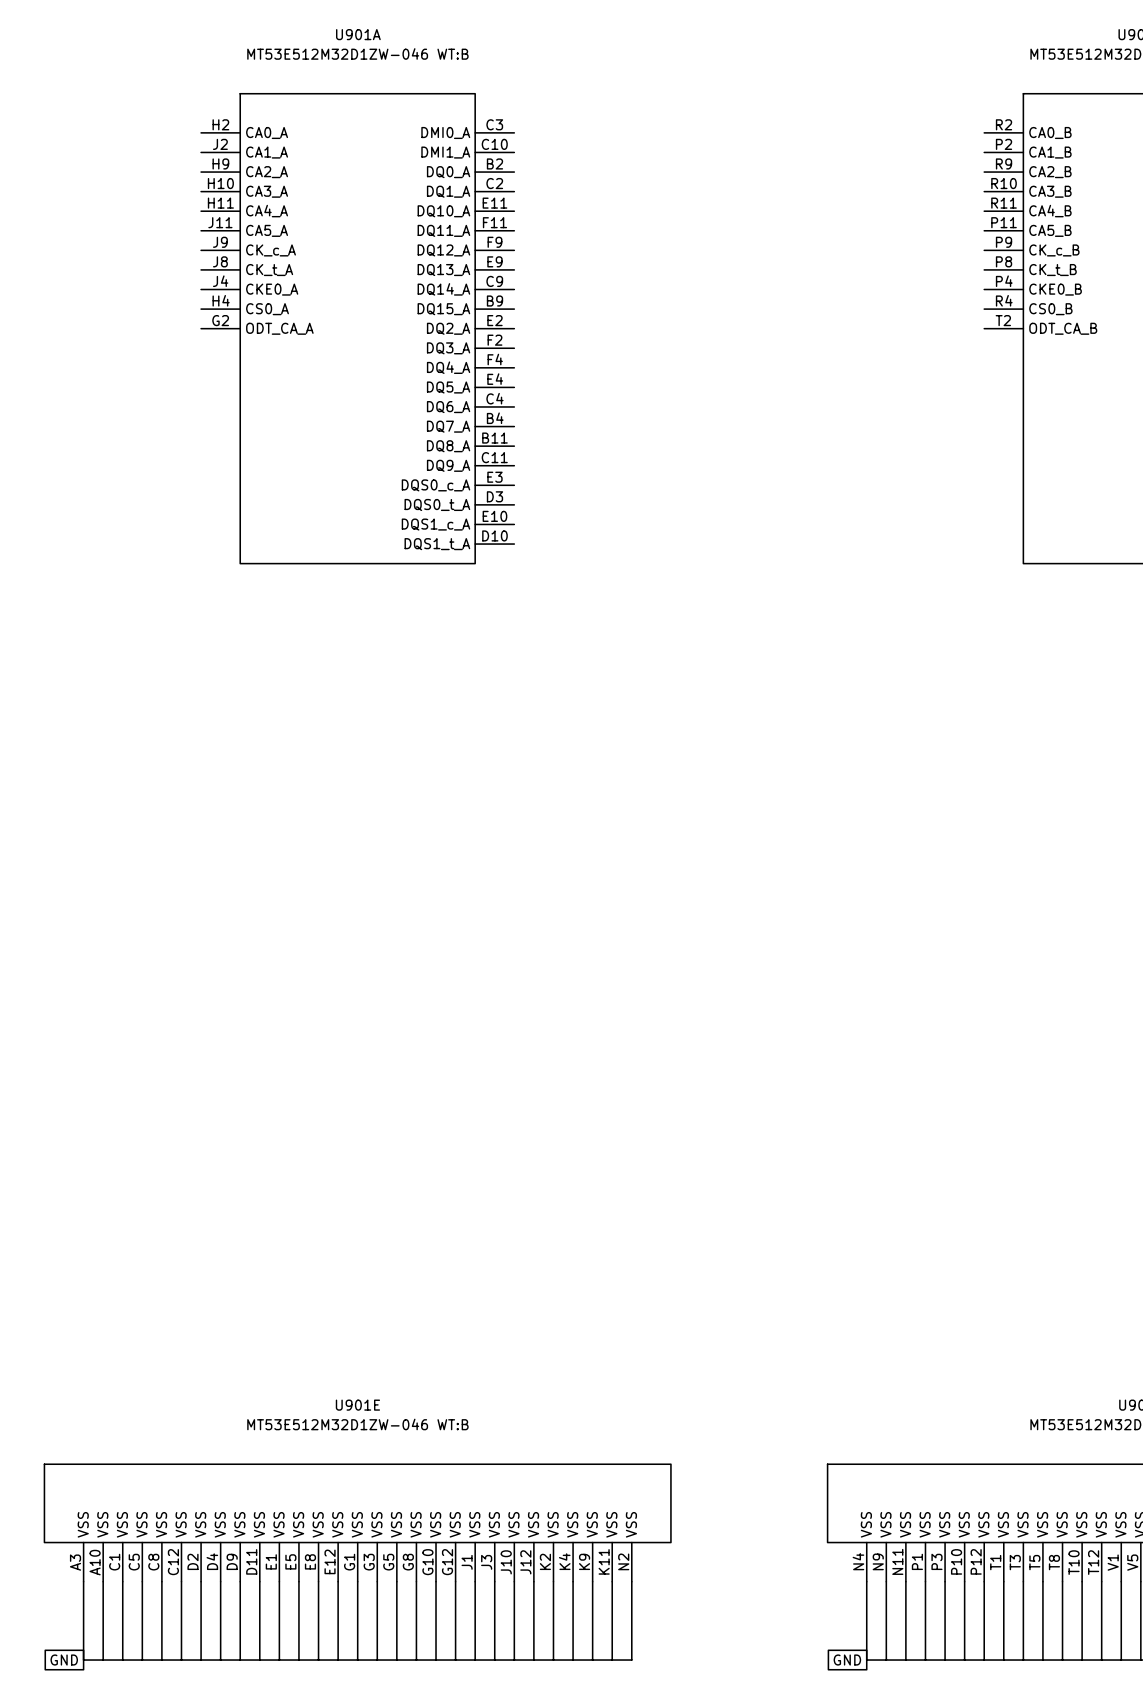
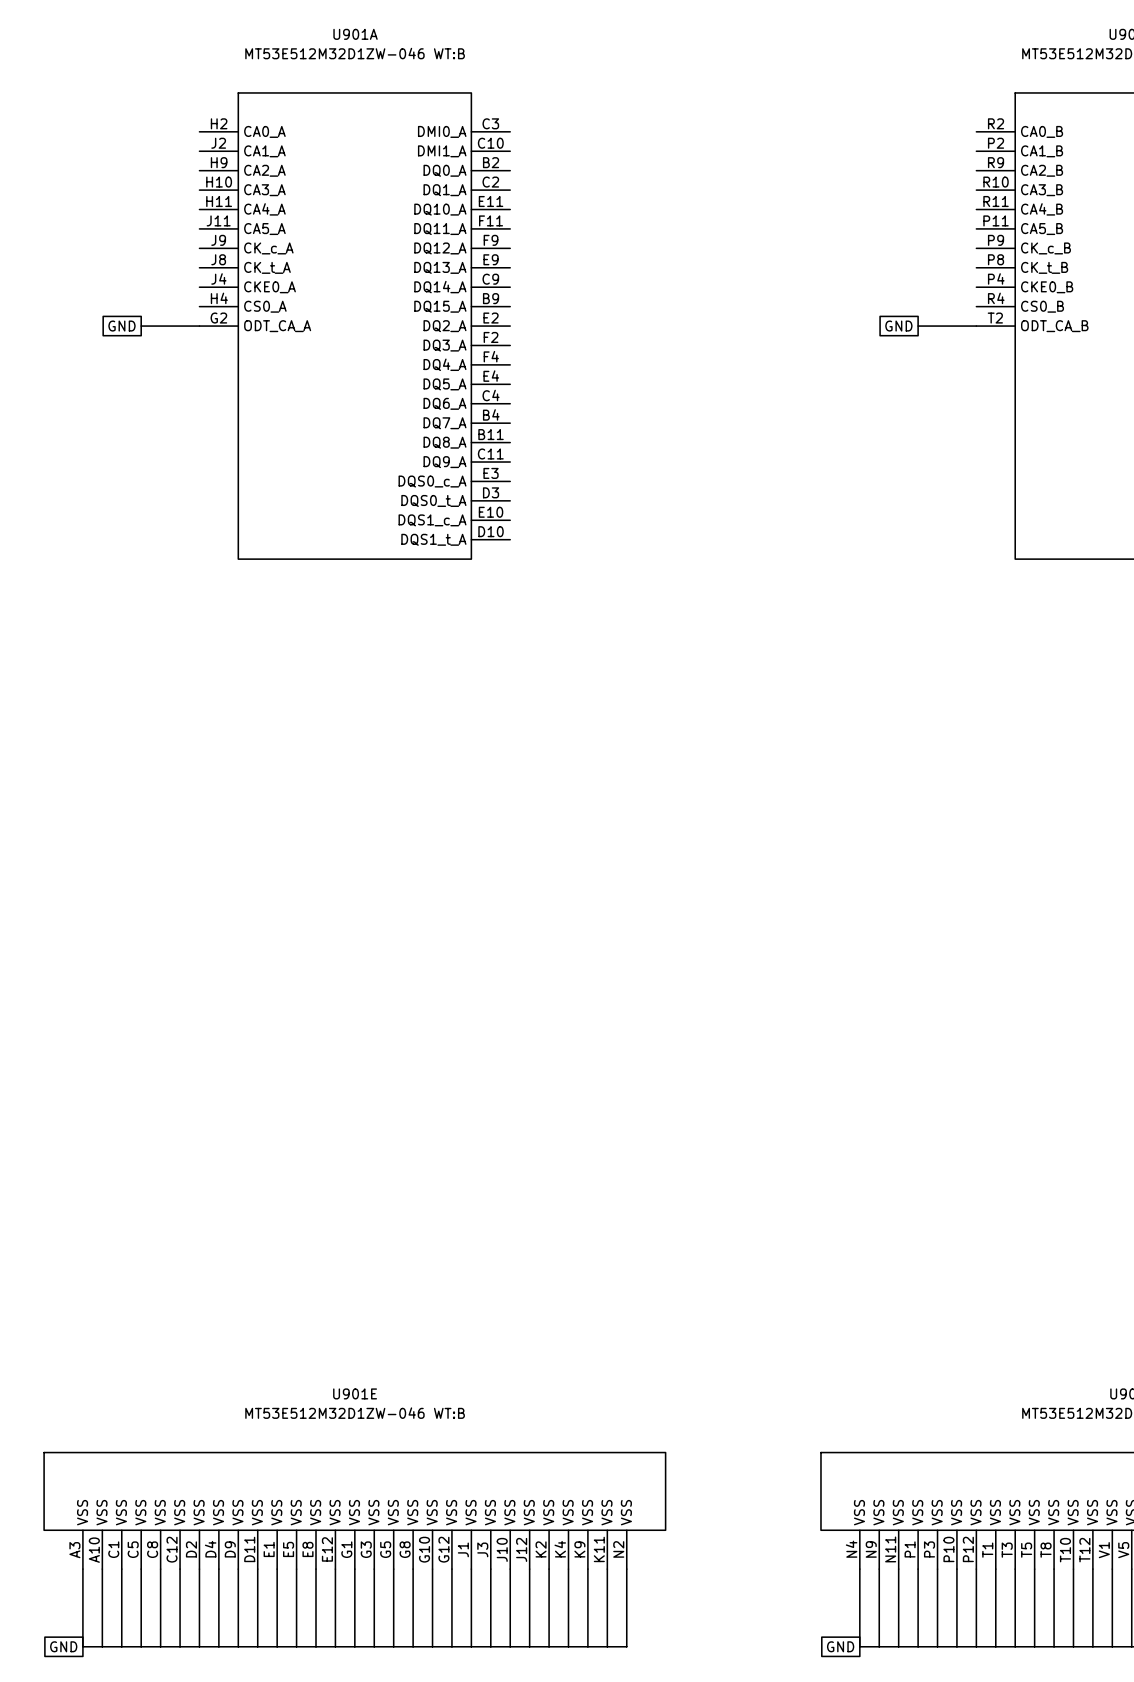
global label: none -> GND (121, 326)
wire: none -> (141, 326) (199, 326)
global label: none -> GND (898, 326)
wire: none -> (918, 326) (976, 326)

